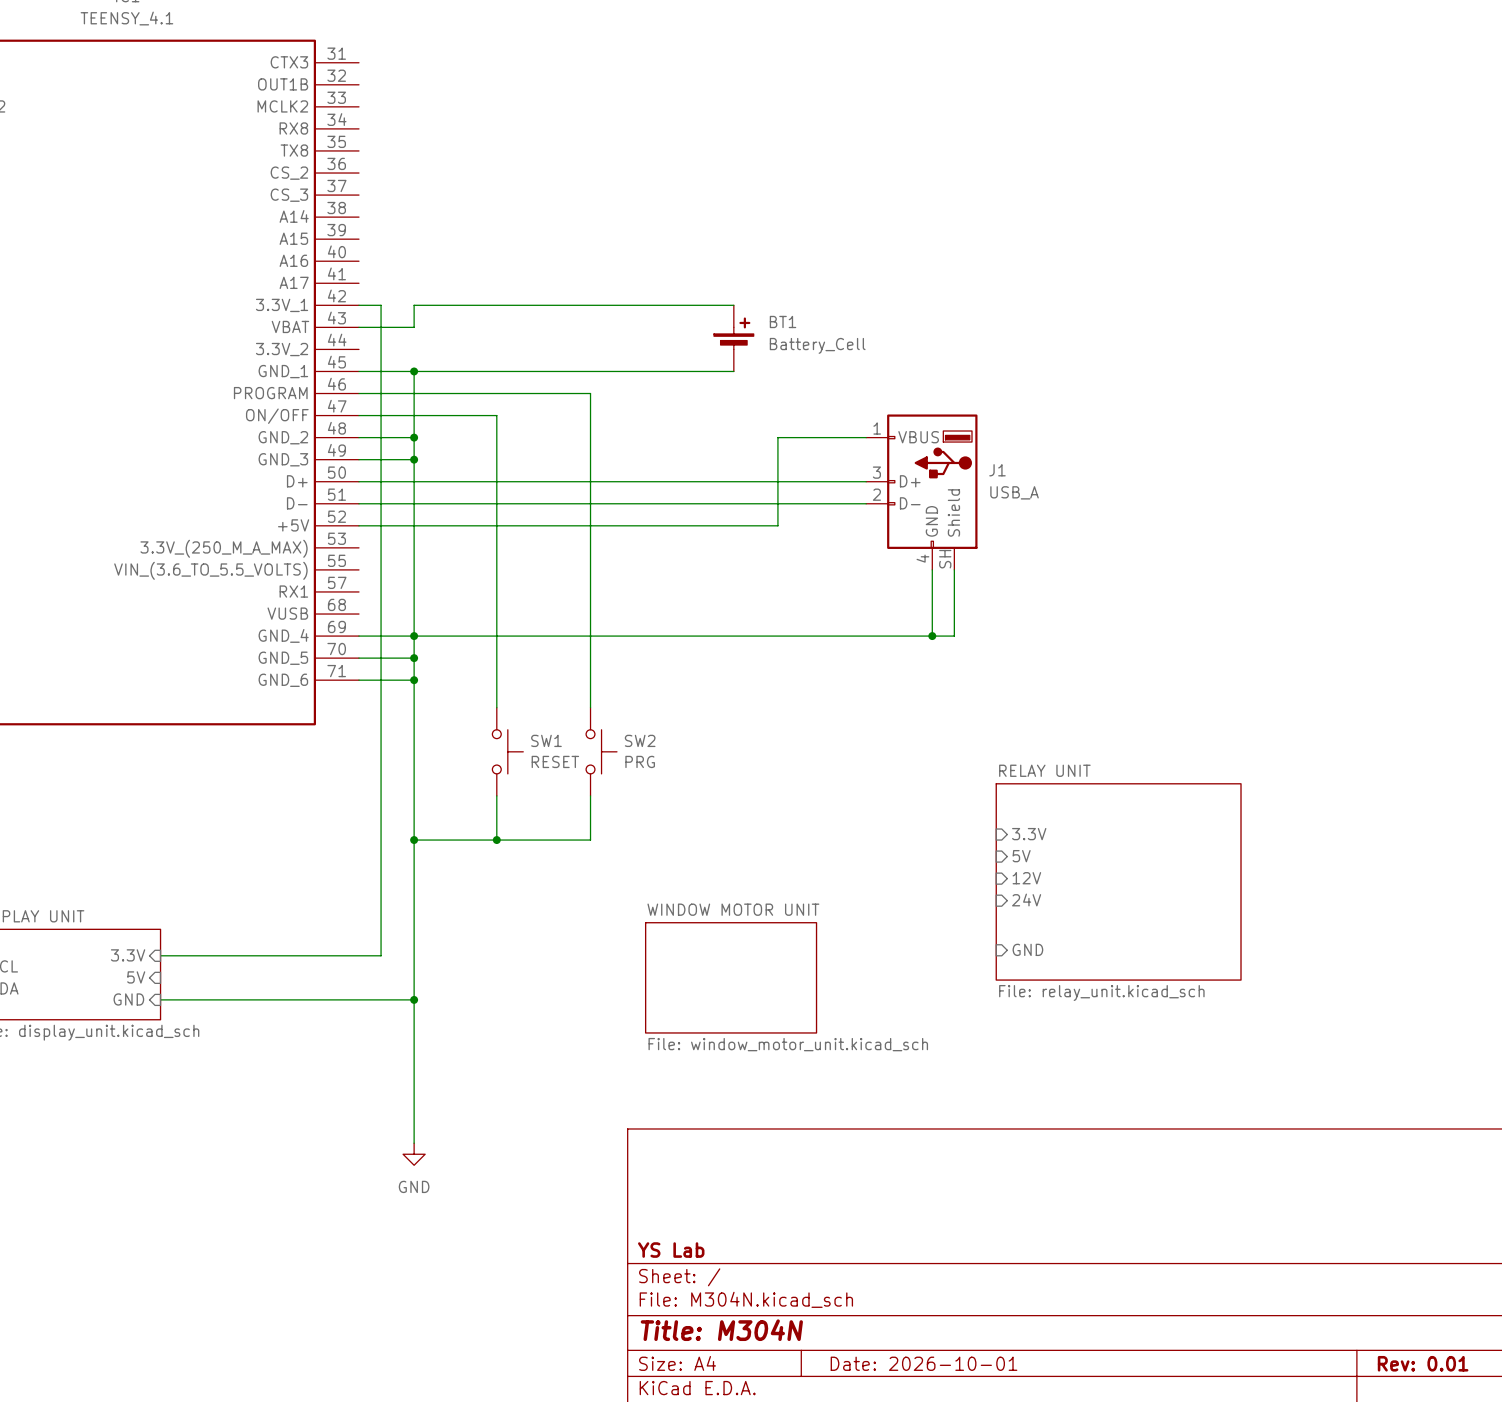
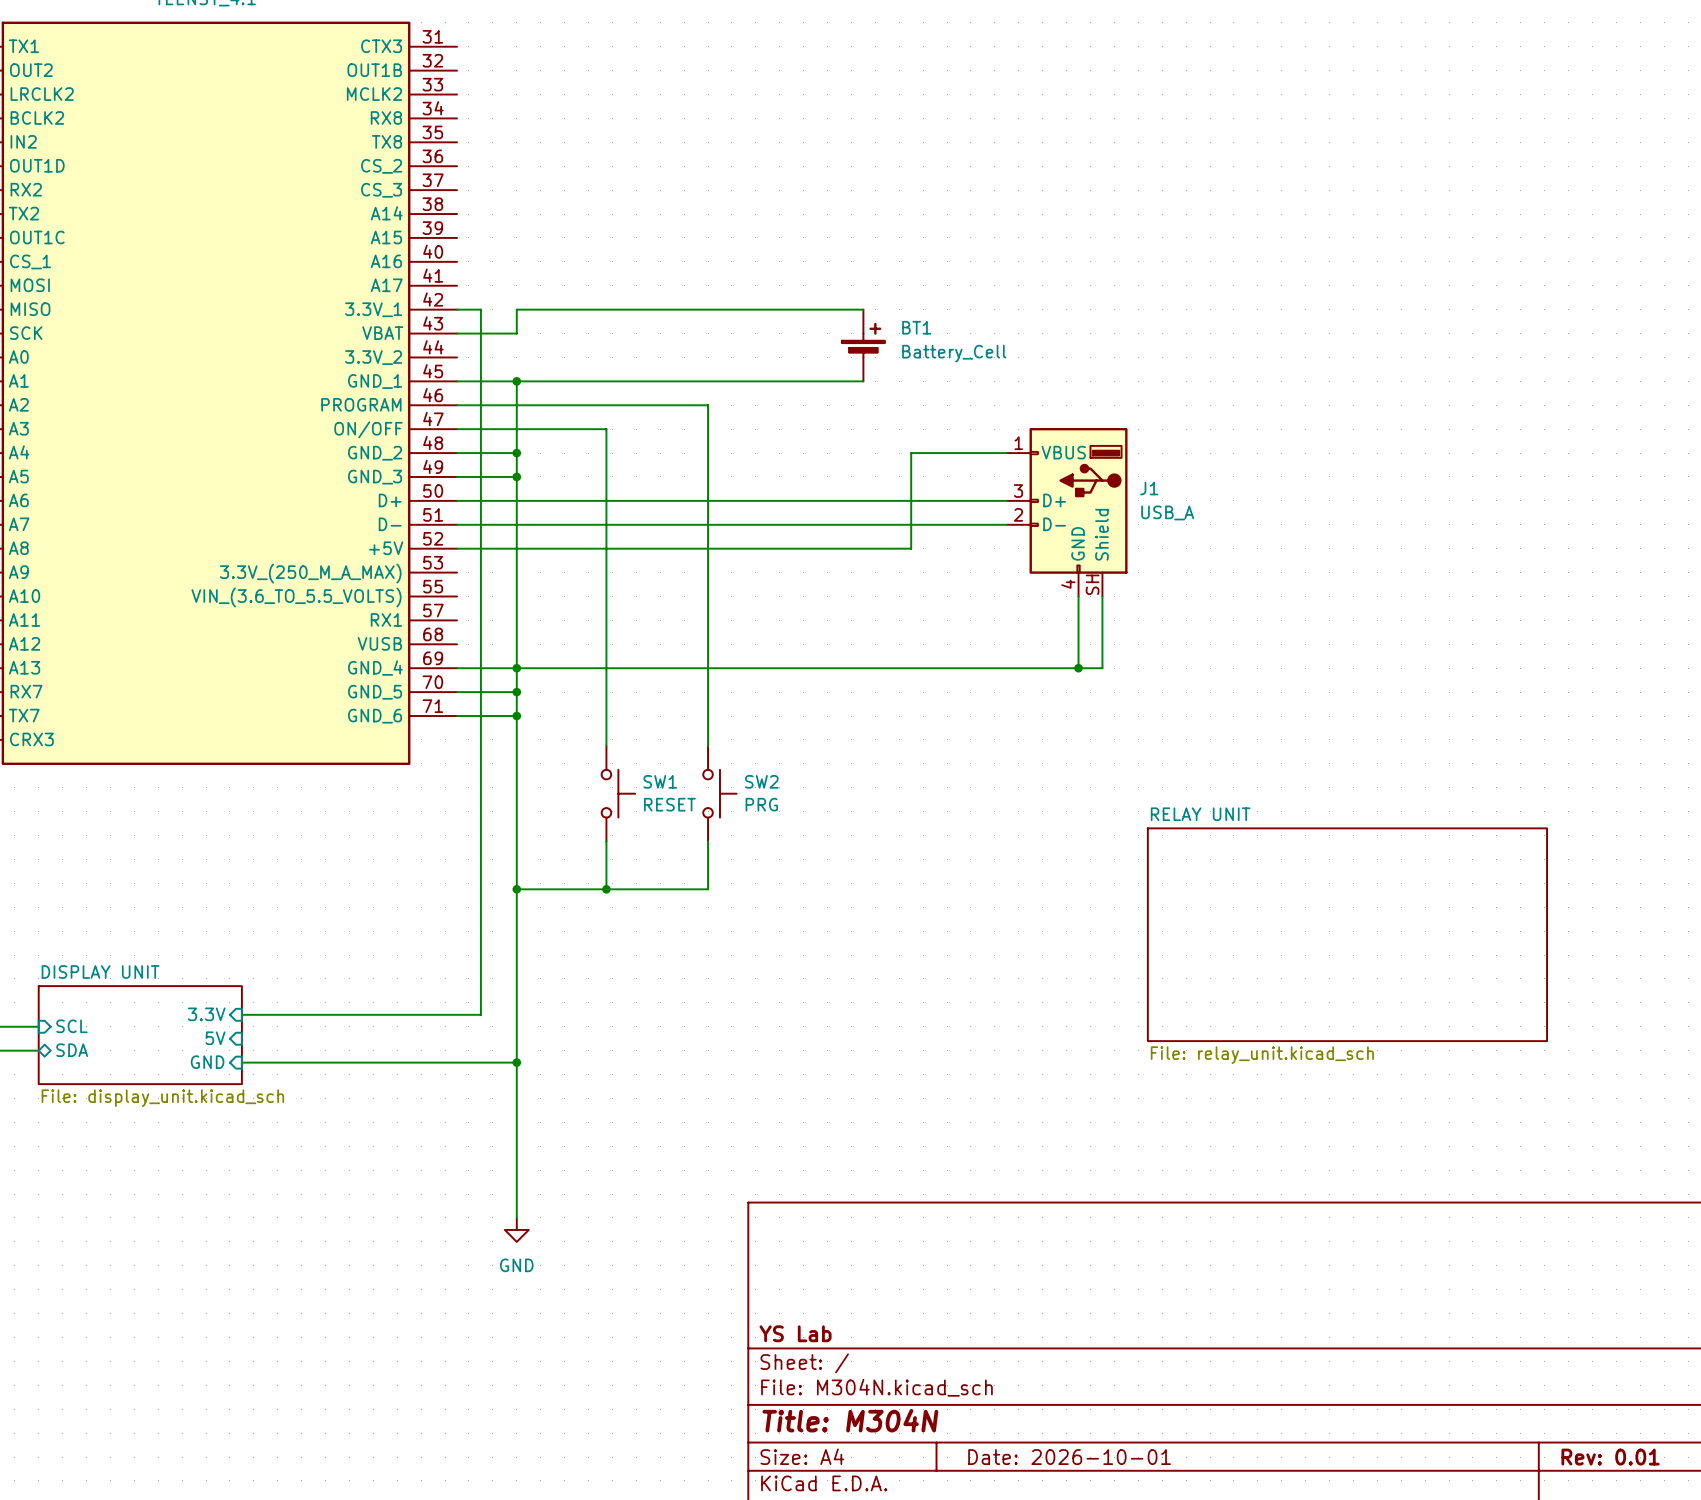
sheet pin: 3.3V (1029, 834) -> none
sheet pin: 5V (1021, 856) -> none
sheet pin: 12V (1026, 878) -> none
sheet RELAY UNIT: File: relay_unit.kicad_sch (1118, 881) -> none
sheet RELAY UNIT: none -> File: relay_unit.kicad_sch (1347, 934)
sheet pin: 24V (1026, 900) -> none
sheet pin: GND (1027, 949) -> none
sheet WINDOW MOTOR UNIT: File: window_motor_unit.kicad_sch (731, 977) -> none

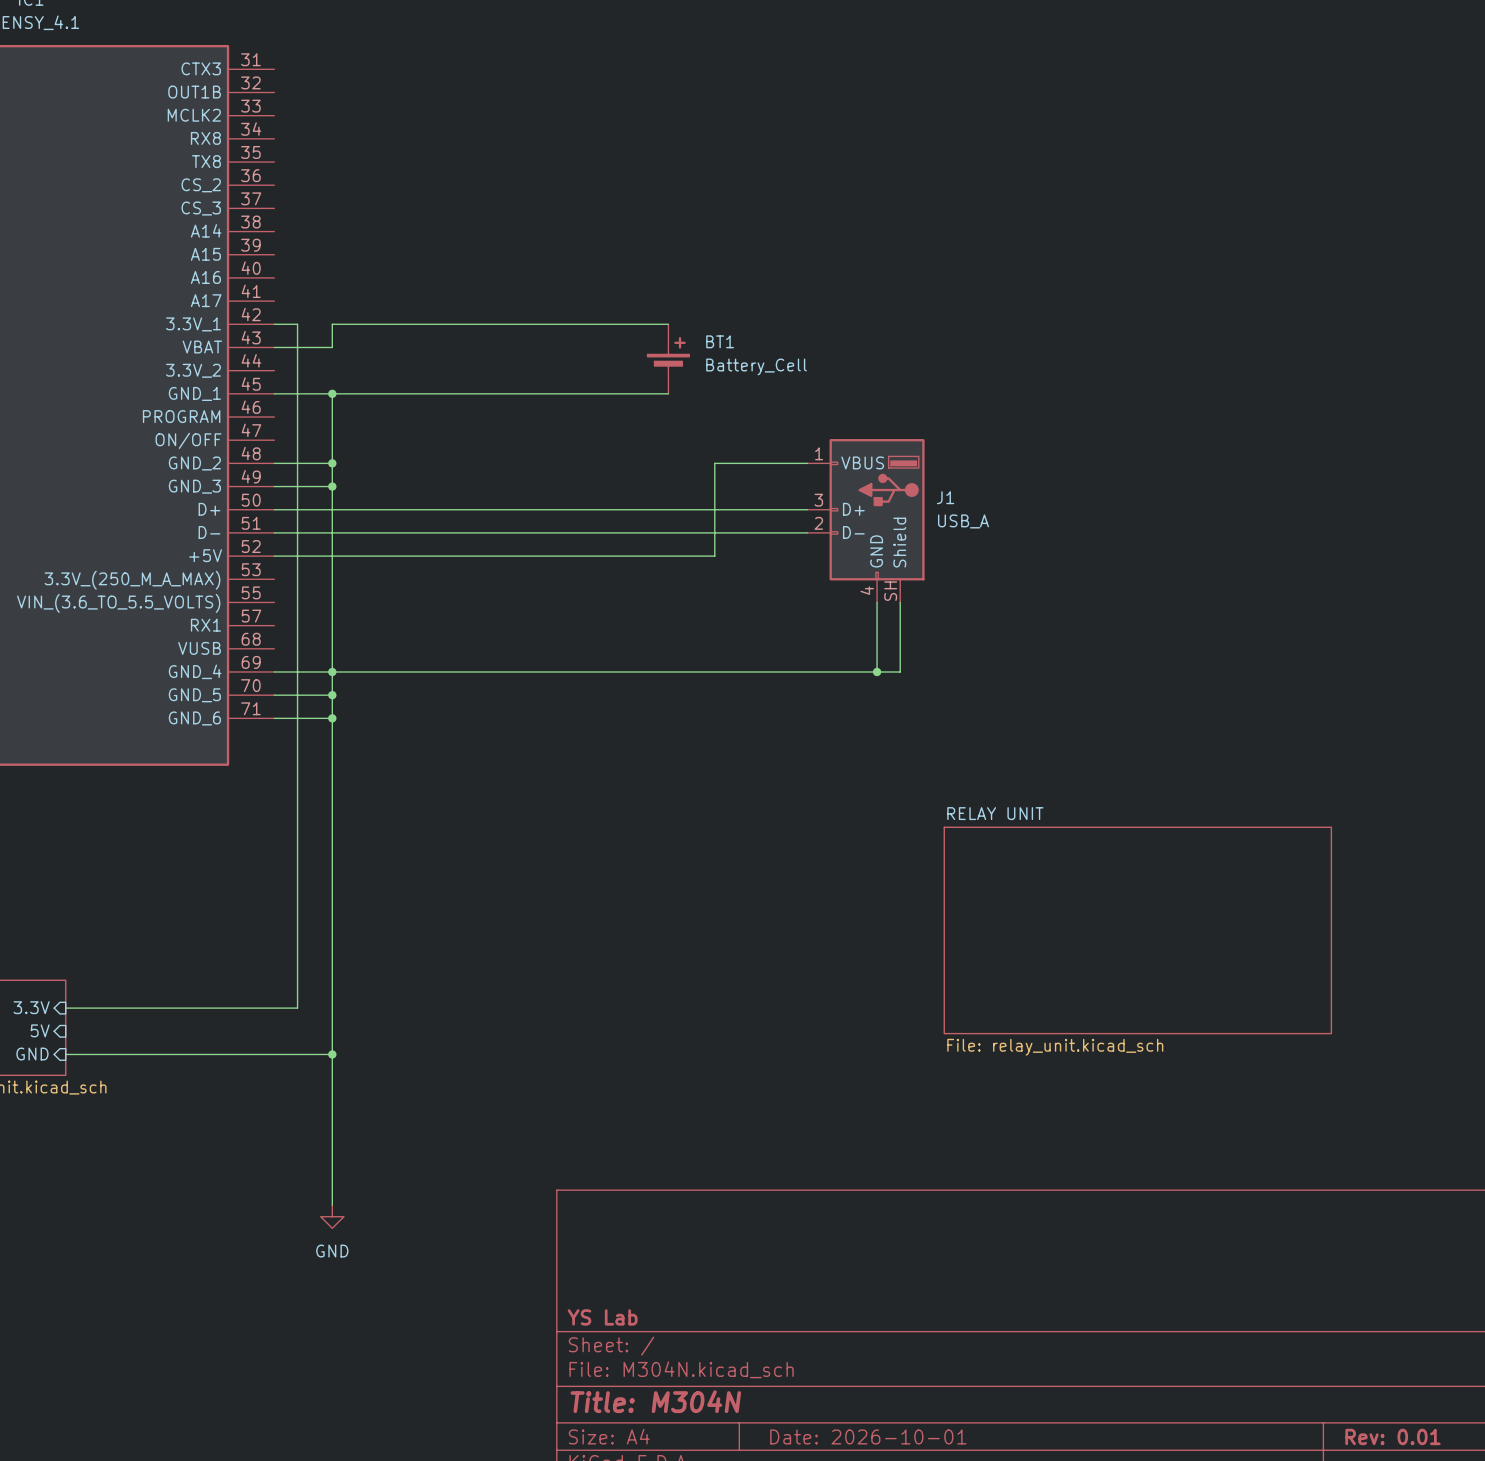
wire: (457, 405) (708, 405) (708, 745) -> none
wire: (457, 429) (606, 429) (606, 745) -> none
SW1: RESET (618, 793) -> none
SW2: PRG (719, 793) -> none
wire: (606, 841) (606, 889) -> none
wire: (708, 841) (708, 889) (516, 889) -> none
junction: (516, 889) -> none
junction: (606, 889) -> none

